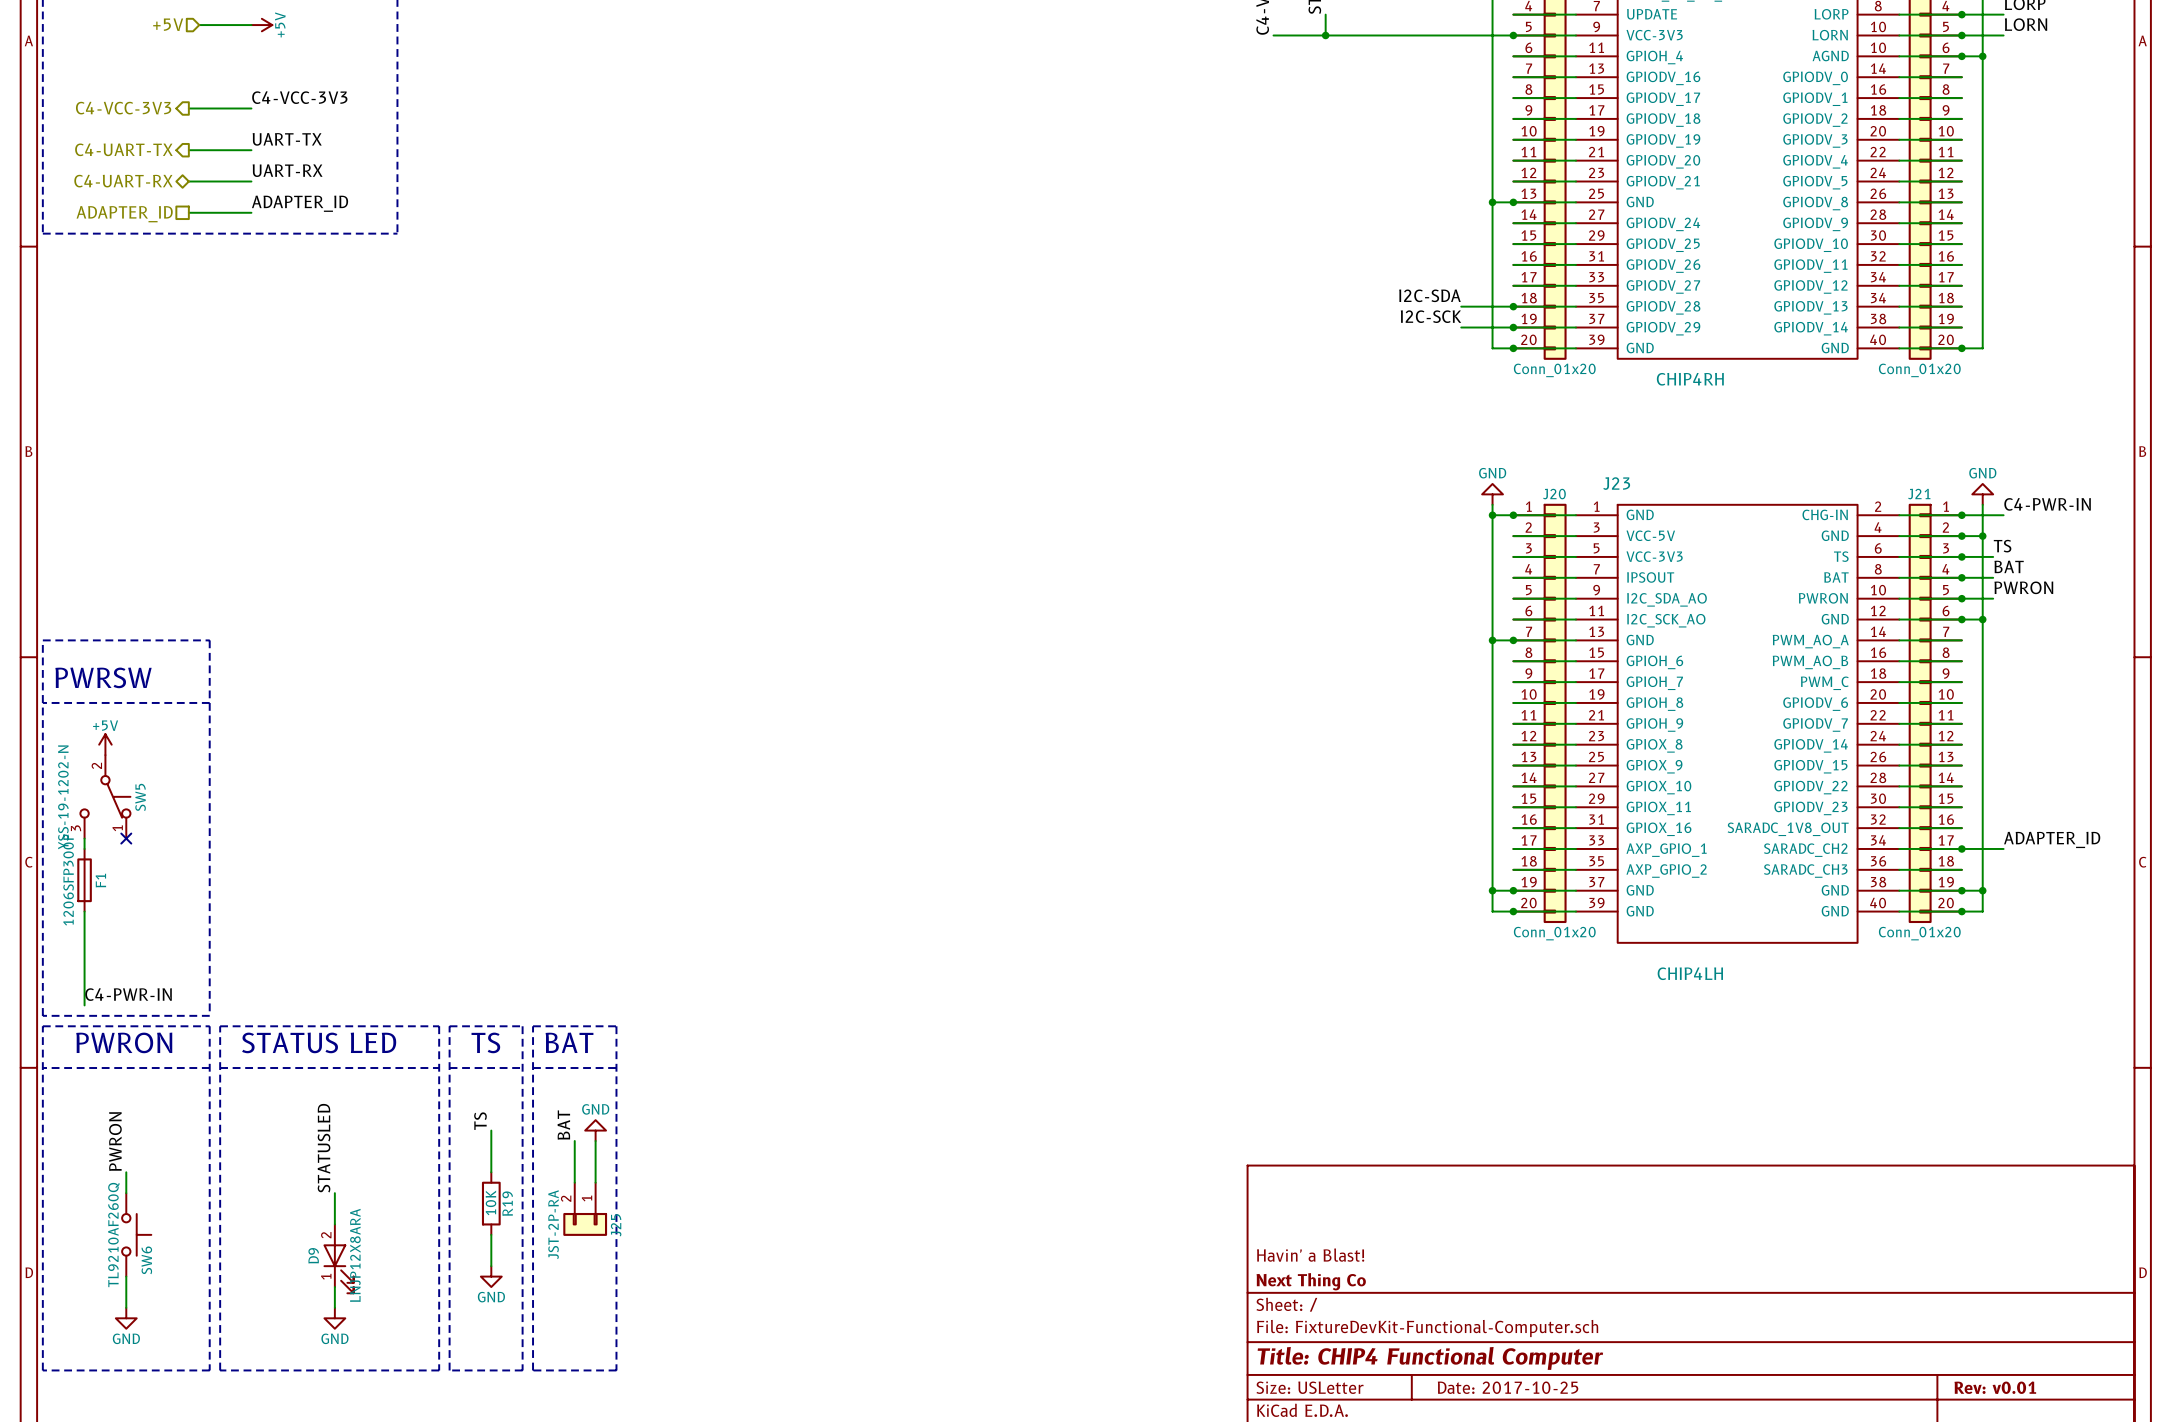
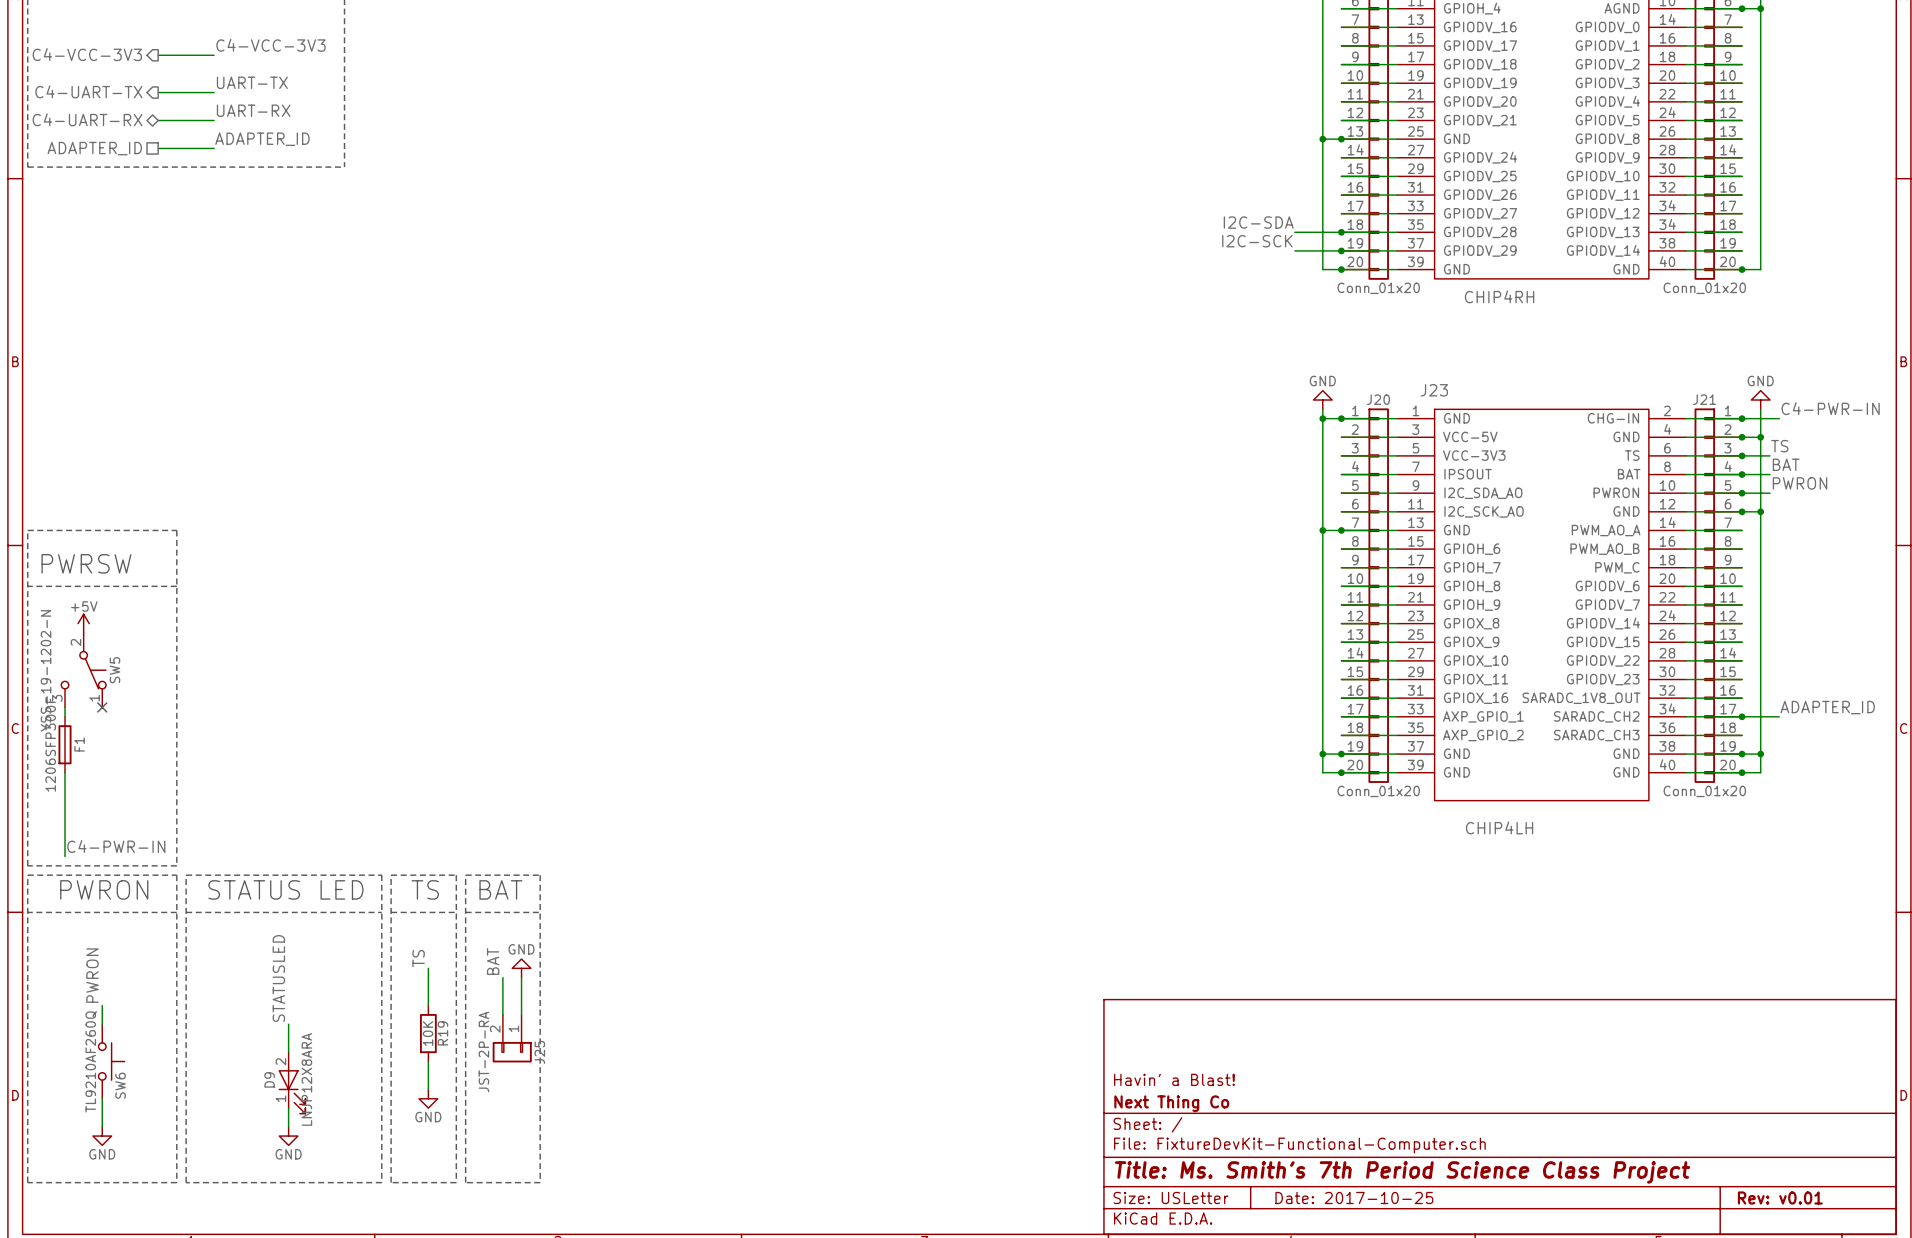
title block: Title: CHIP4 Functional Computer (1430, 1358) -> Title: Ms. Smith's 7th Period Science Class Project (1402, 1172)

